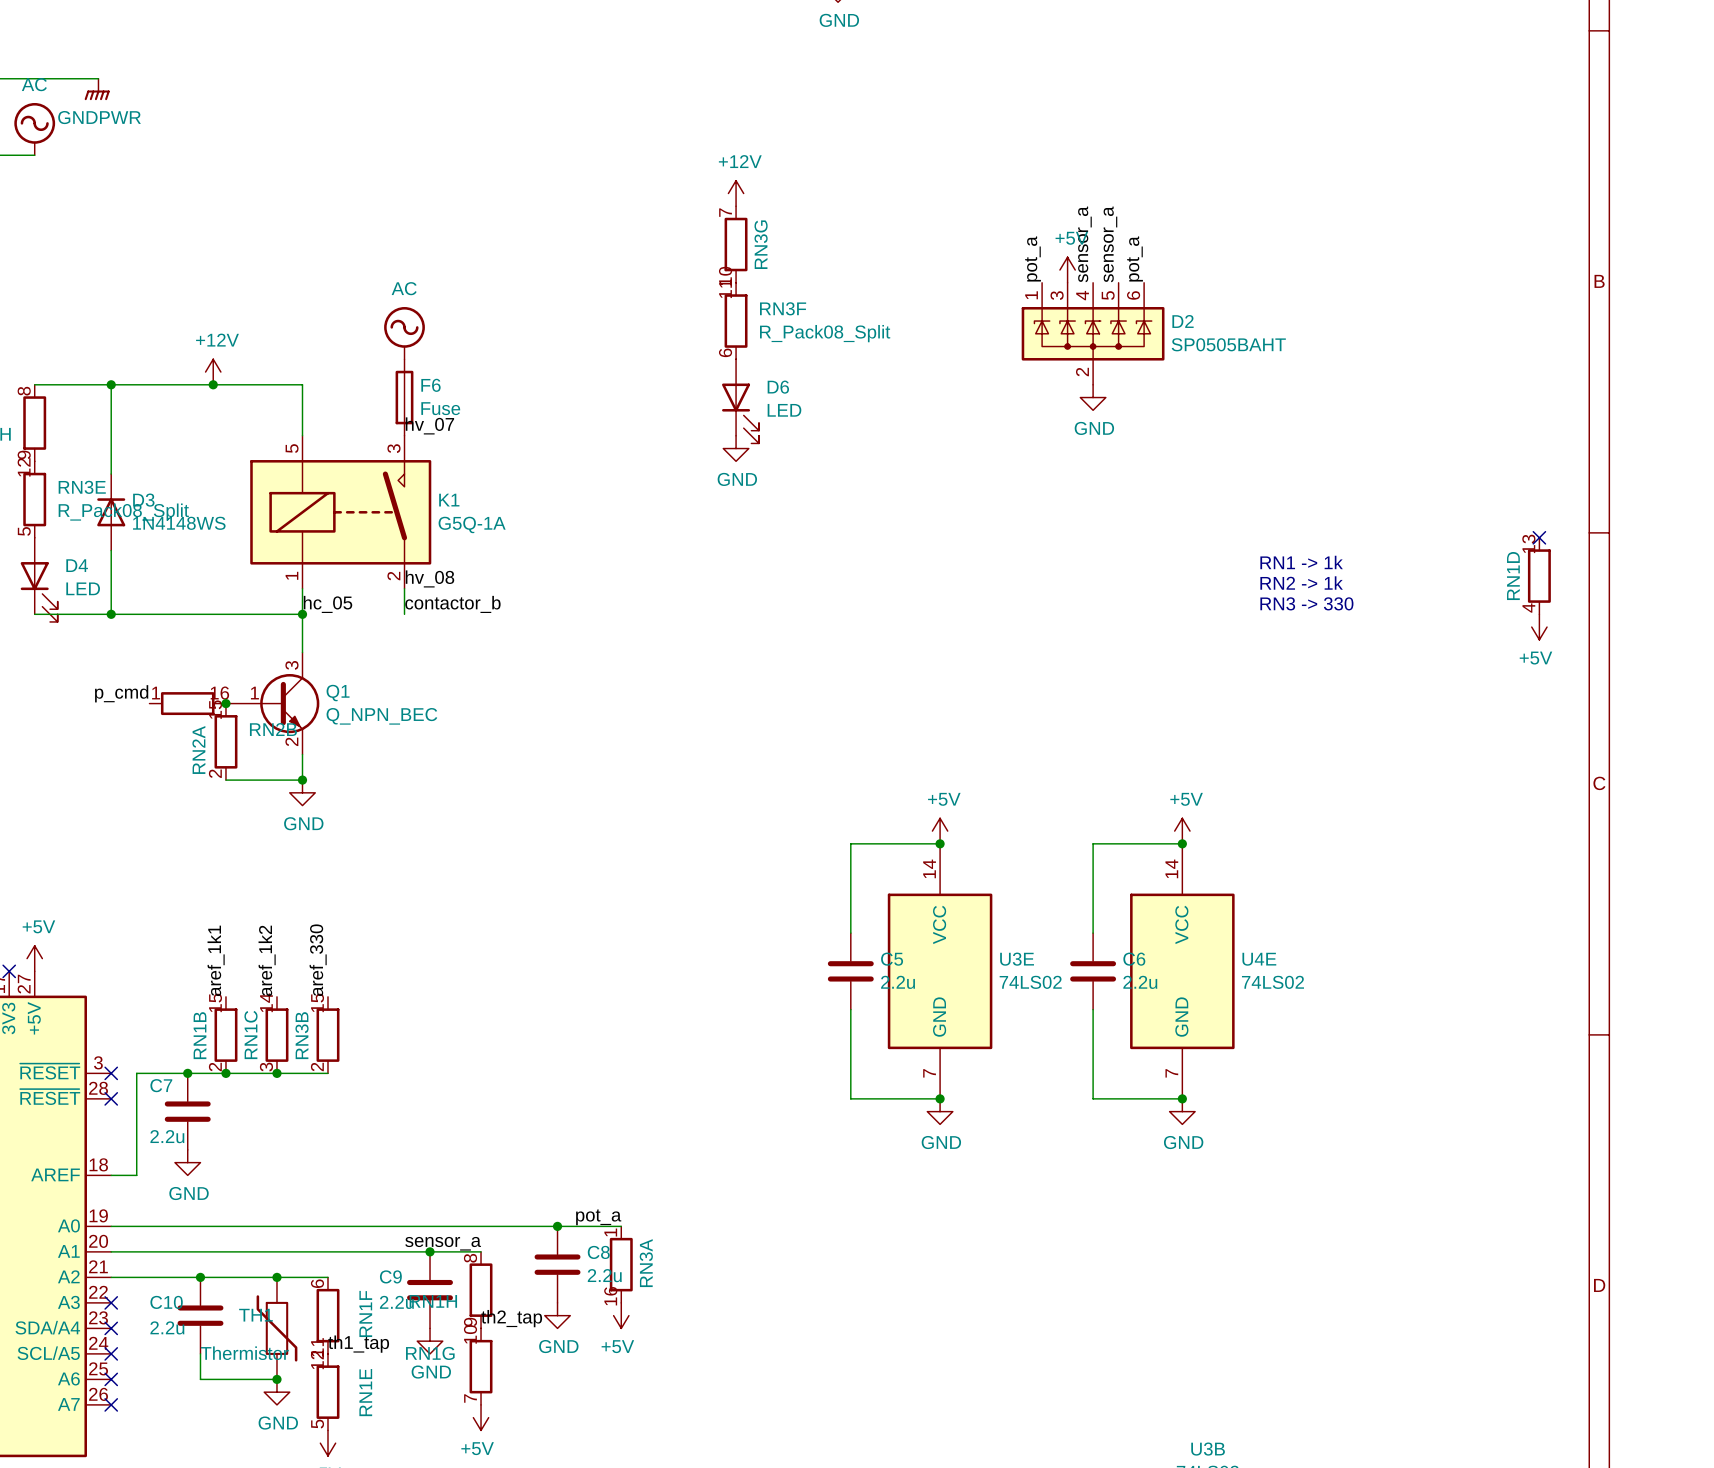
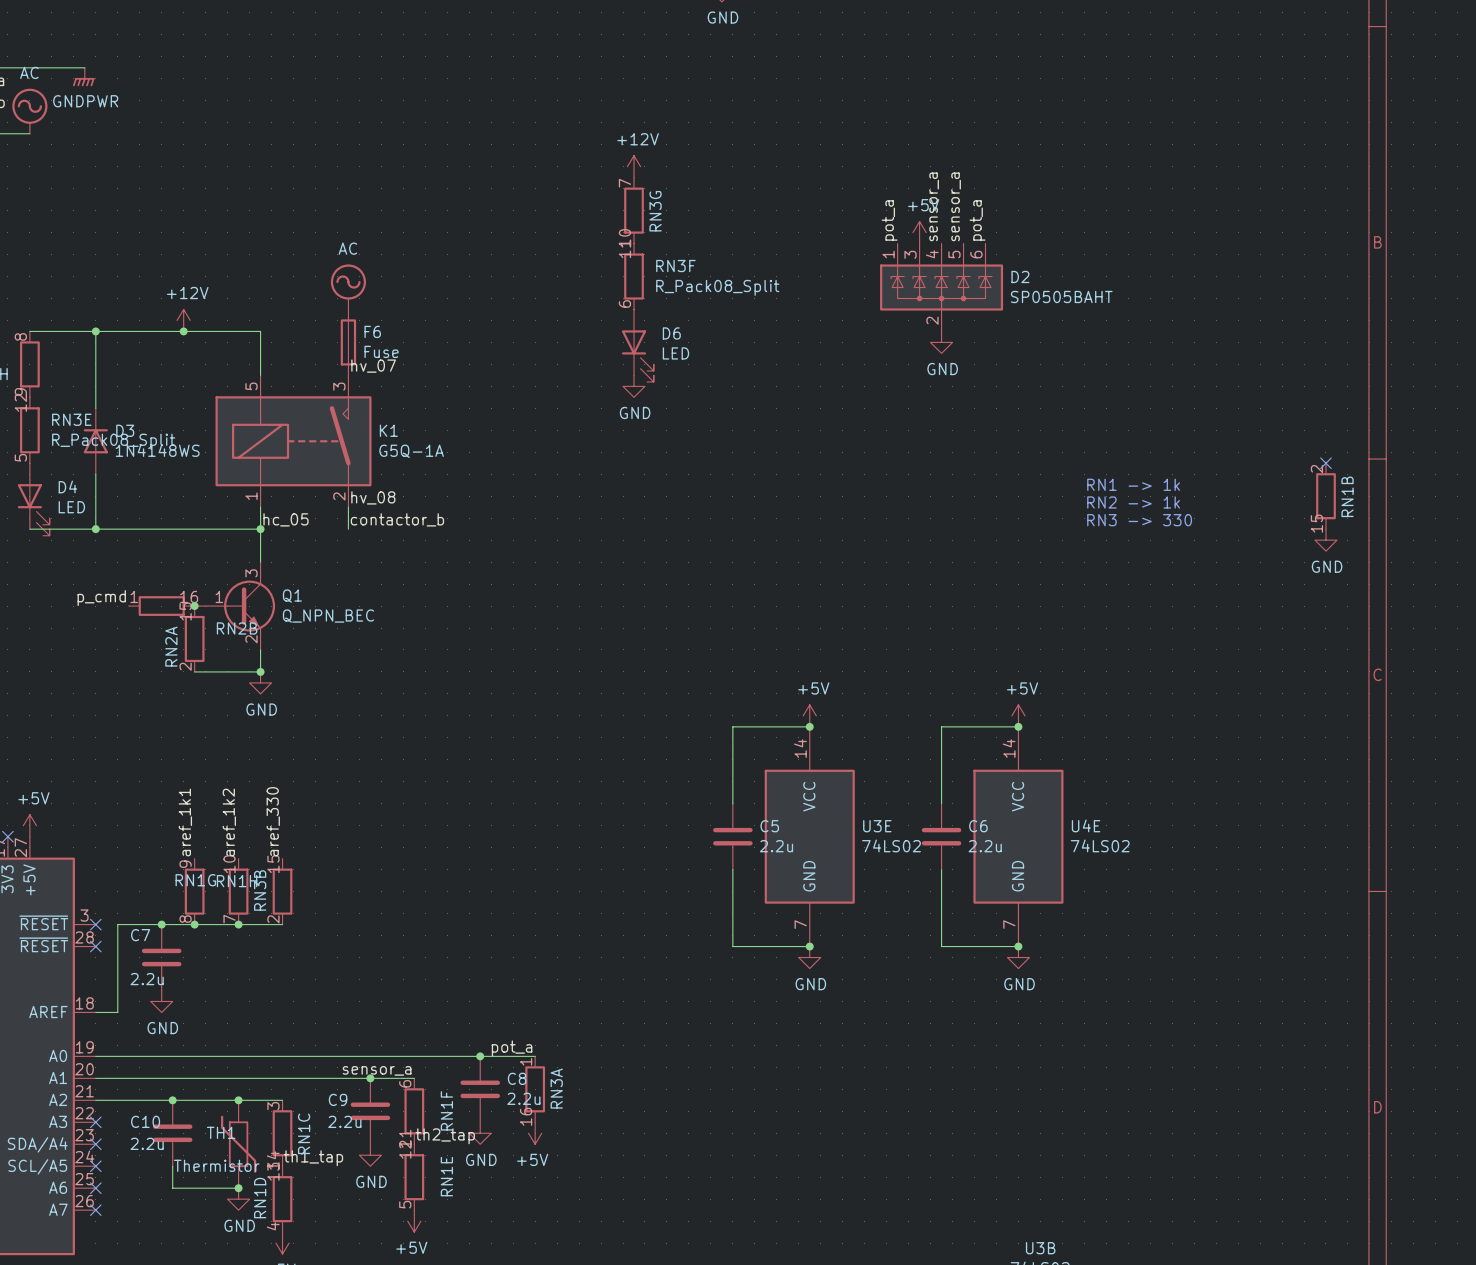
RN1D position: (1539, 576) -> (282, 1199)
power symbol: +5V (1539, 627) -> GND (1325, 540)
RN1B rotation: 0° (225, 1035) -> 180° (1325, 496)
RN1B position: (225, 1035) -> (1325, 496)
RN1C rotation: 0° (276, 1035) -> 180° (282, 1133)
RN1C position: (276, 1035) -> (282, 1133)
RN1H rotation: 0° (481, 1290) -> 180° (194, 891)
RN1H position: (481, 1290) -> (194, 891)
RN1F position: (327, 1315) -> (414, 1111)
RN1G position: (481, 1366) -> (238, 891)
RN1E position: (327, 1392) -> (414, 1177)

